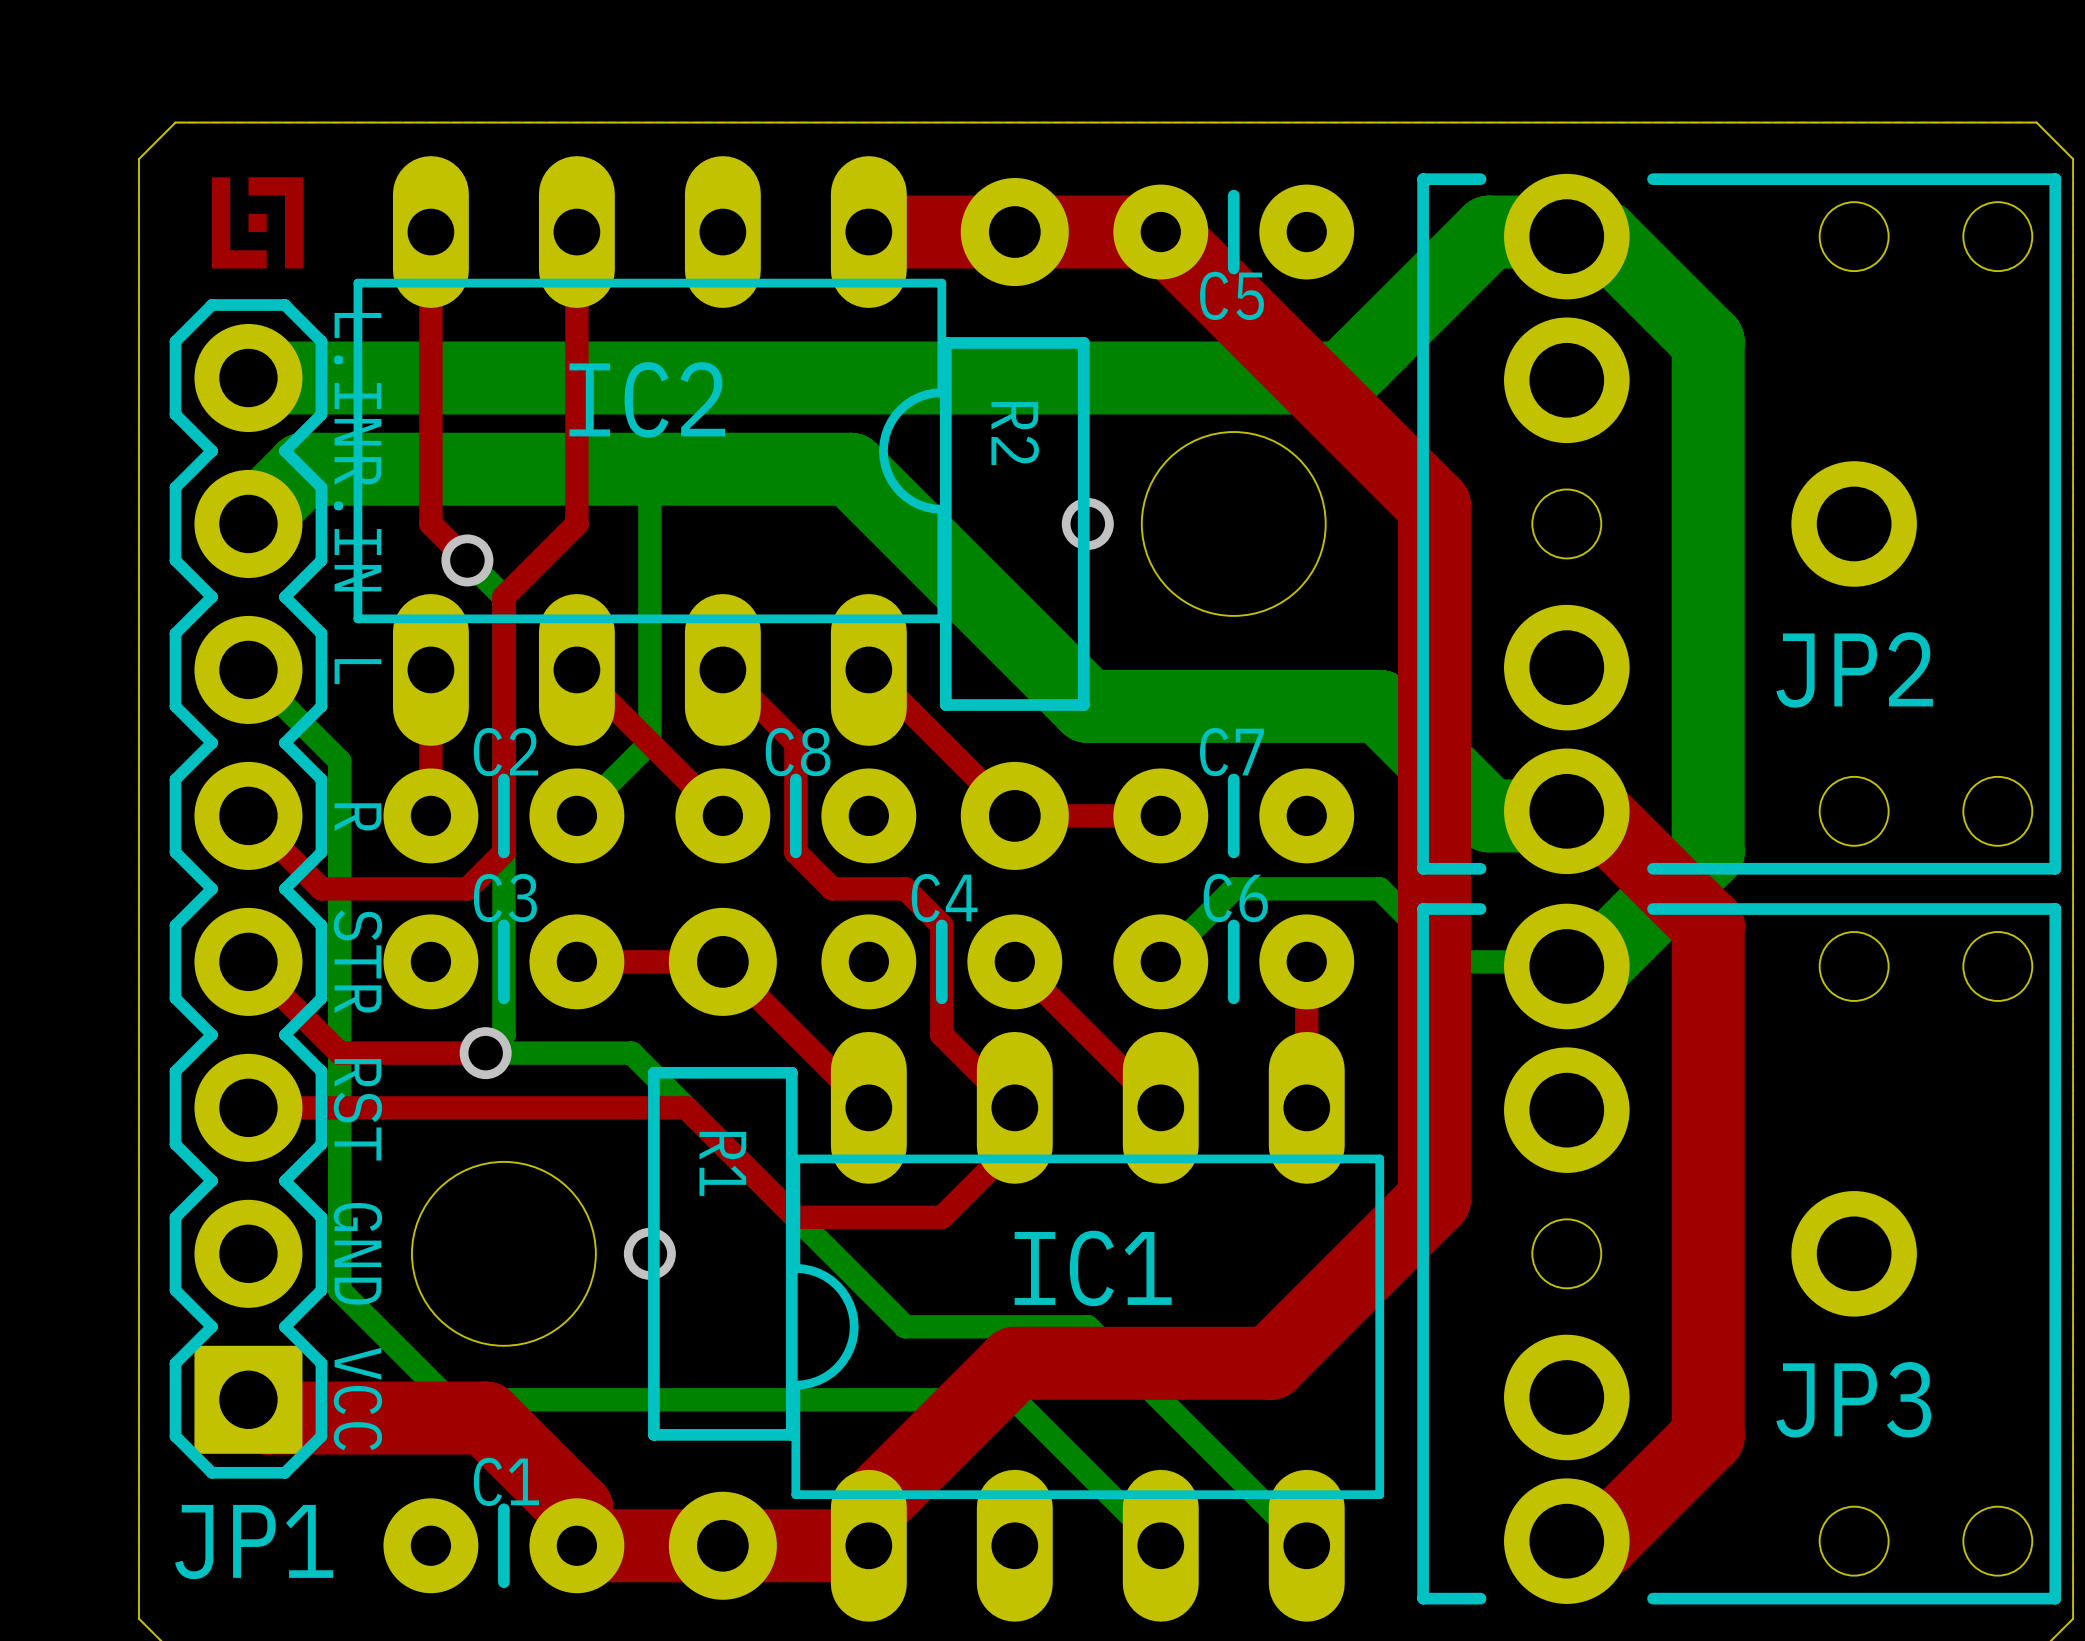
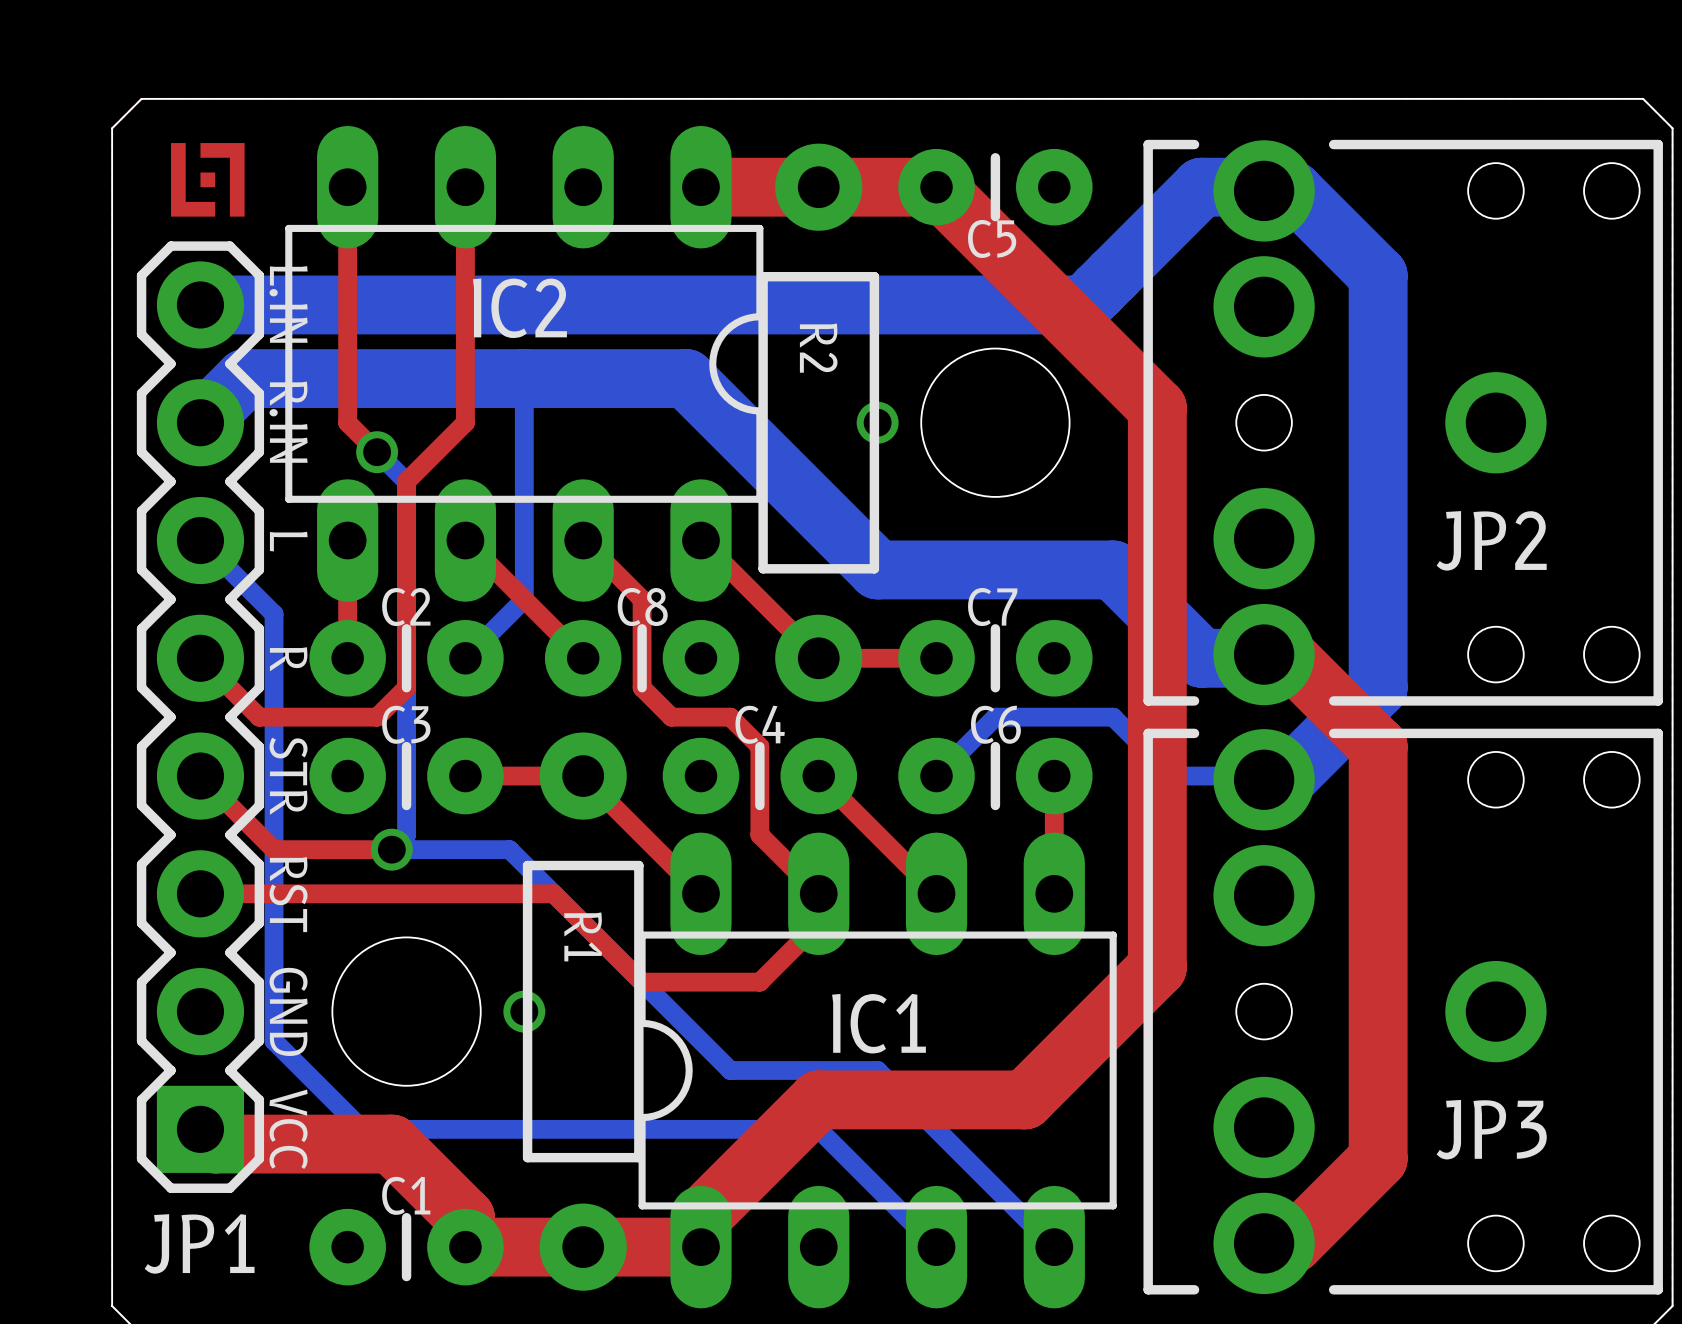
IC2 name position: IC2 (647, 399) -> IC2 (519, 308)

